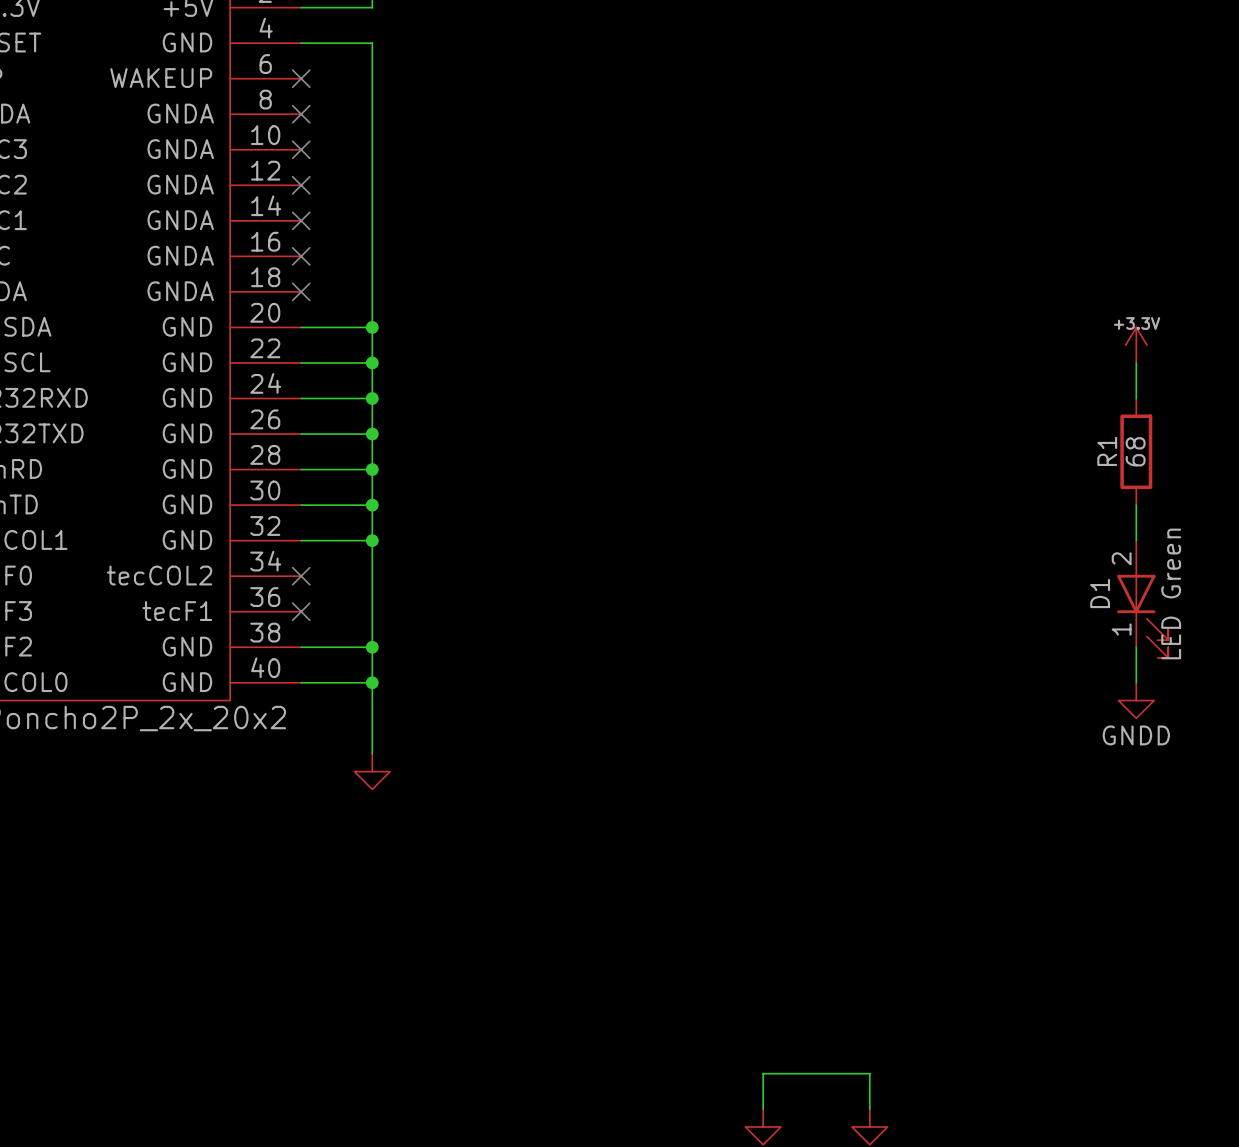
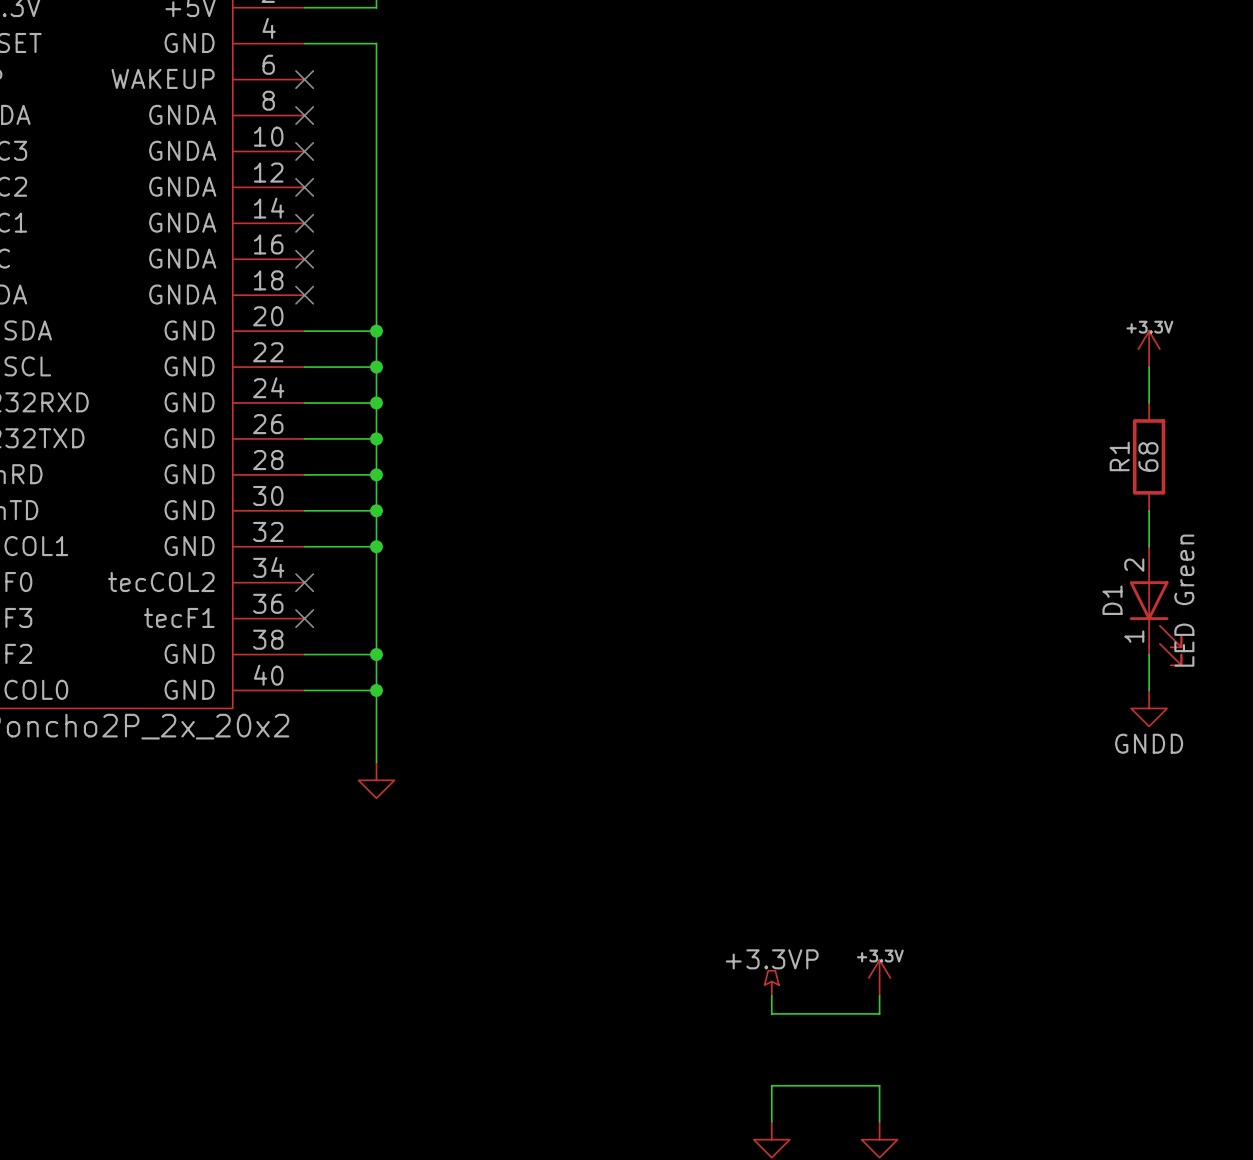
power symbol: none -> +3.3V (879, 977)
power symbol: none -> +3.3VP (771, 983)
wire: none -> (771, 995) (771, 1013) (879, 1013) (879, 995)

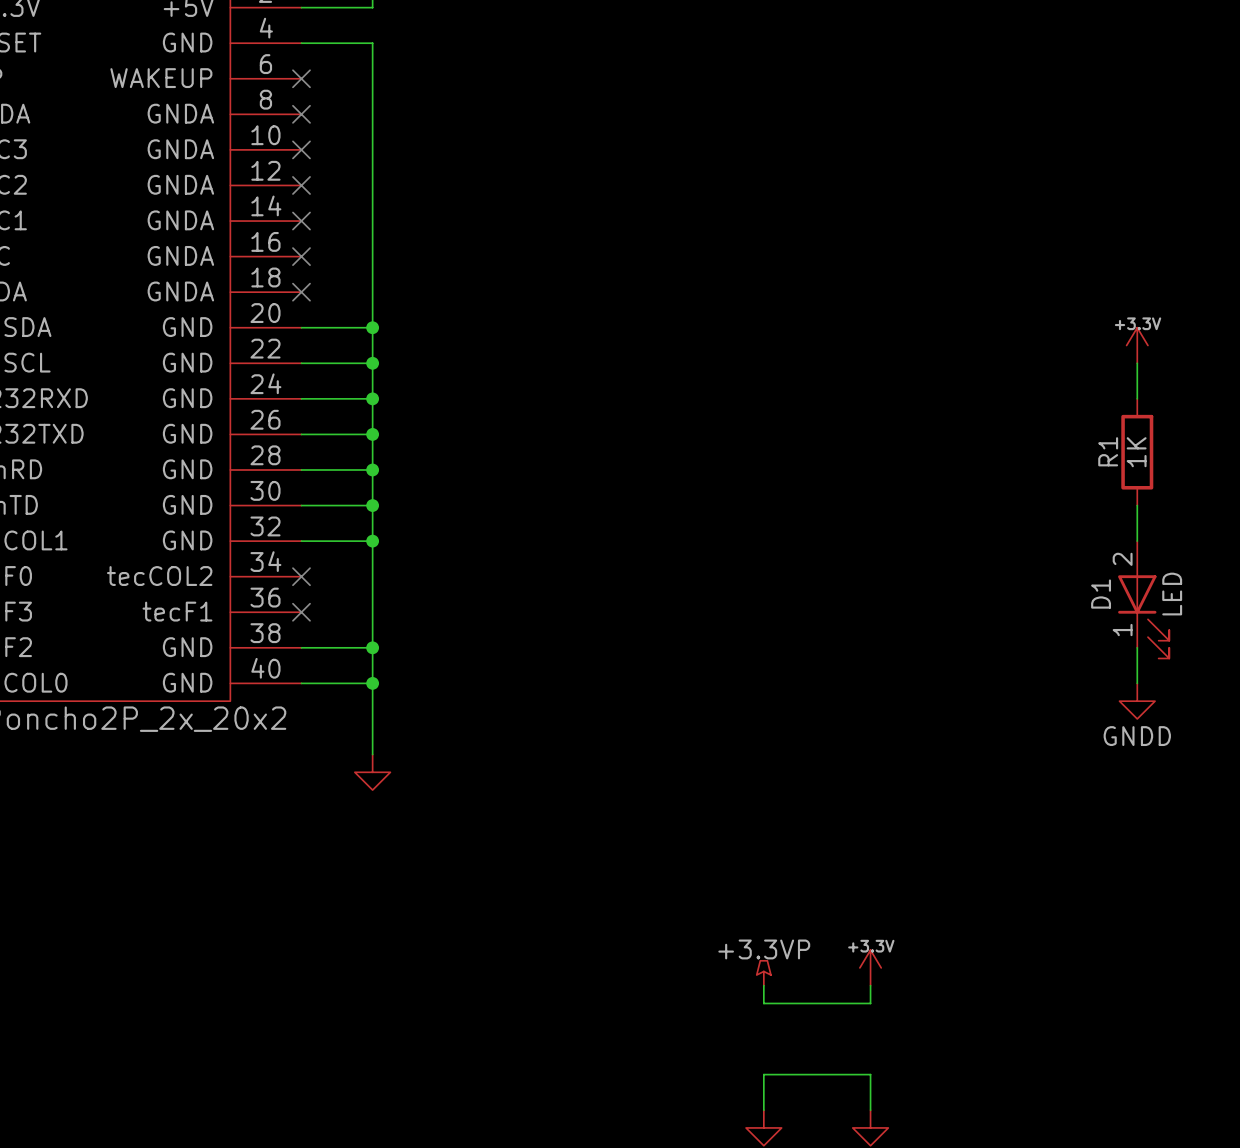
R1 value: 68 (1148, 456) -> 1K (1136, 452)
D1 value: LED Green (1184, 600) -> LED (1172, 594)

